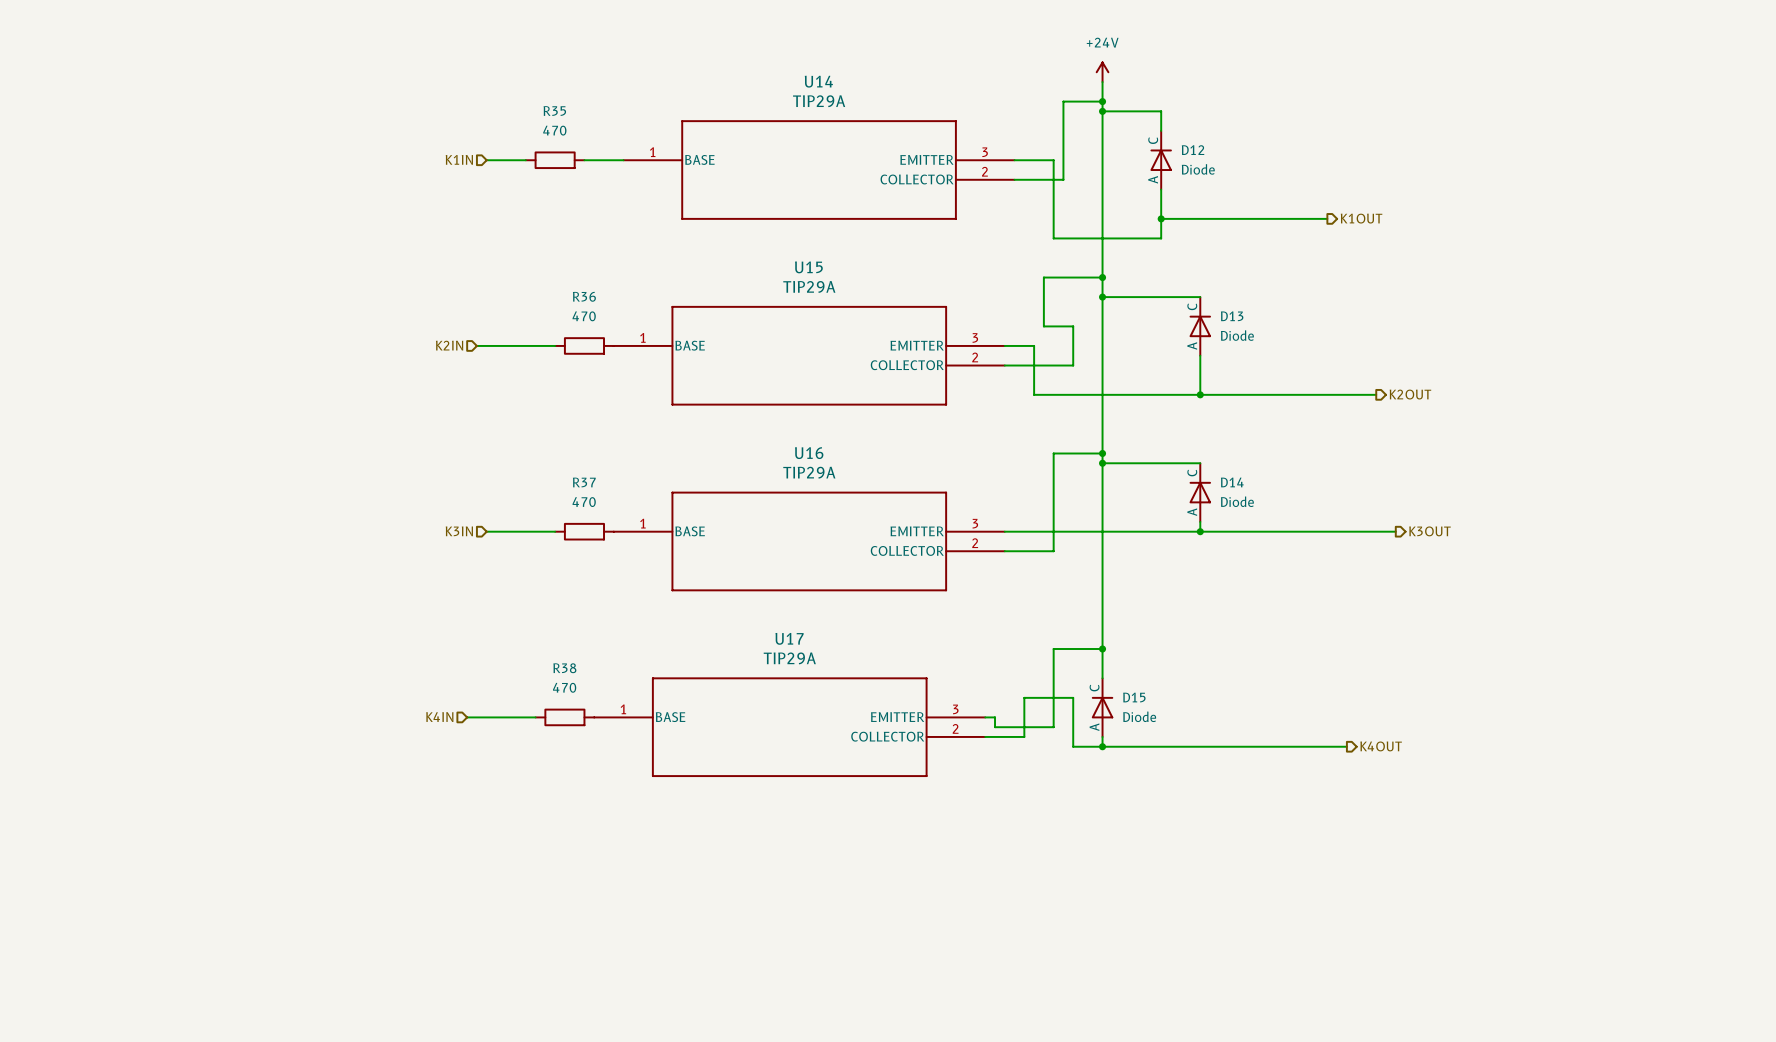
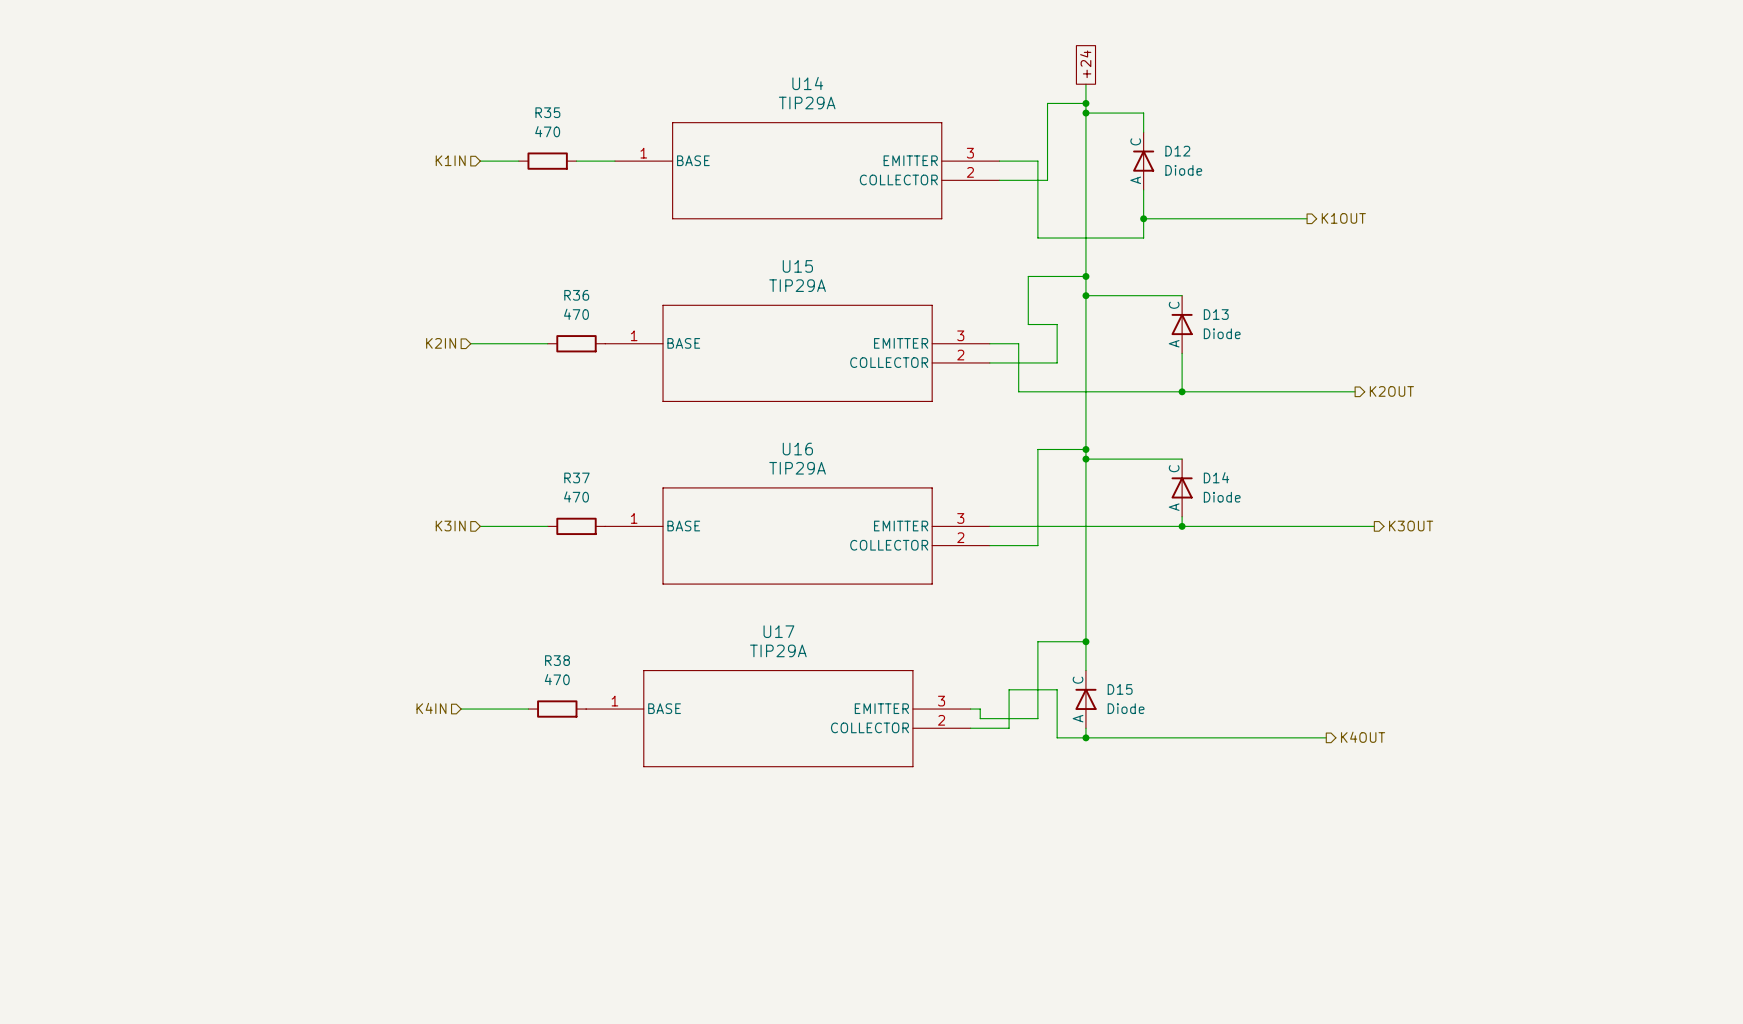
global label: none -> +24 (1085, 64)
power symbol: +24V (1102, 72) -> none

